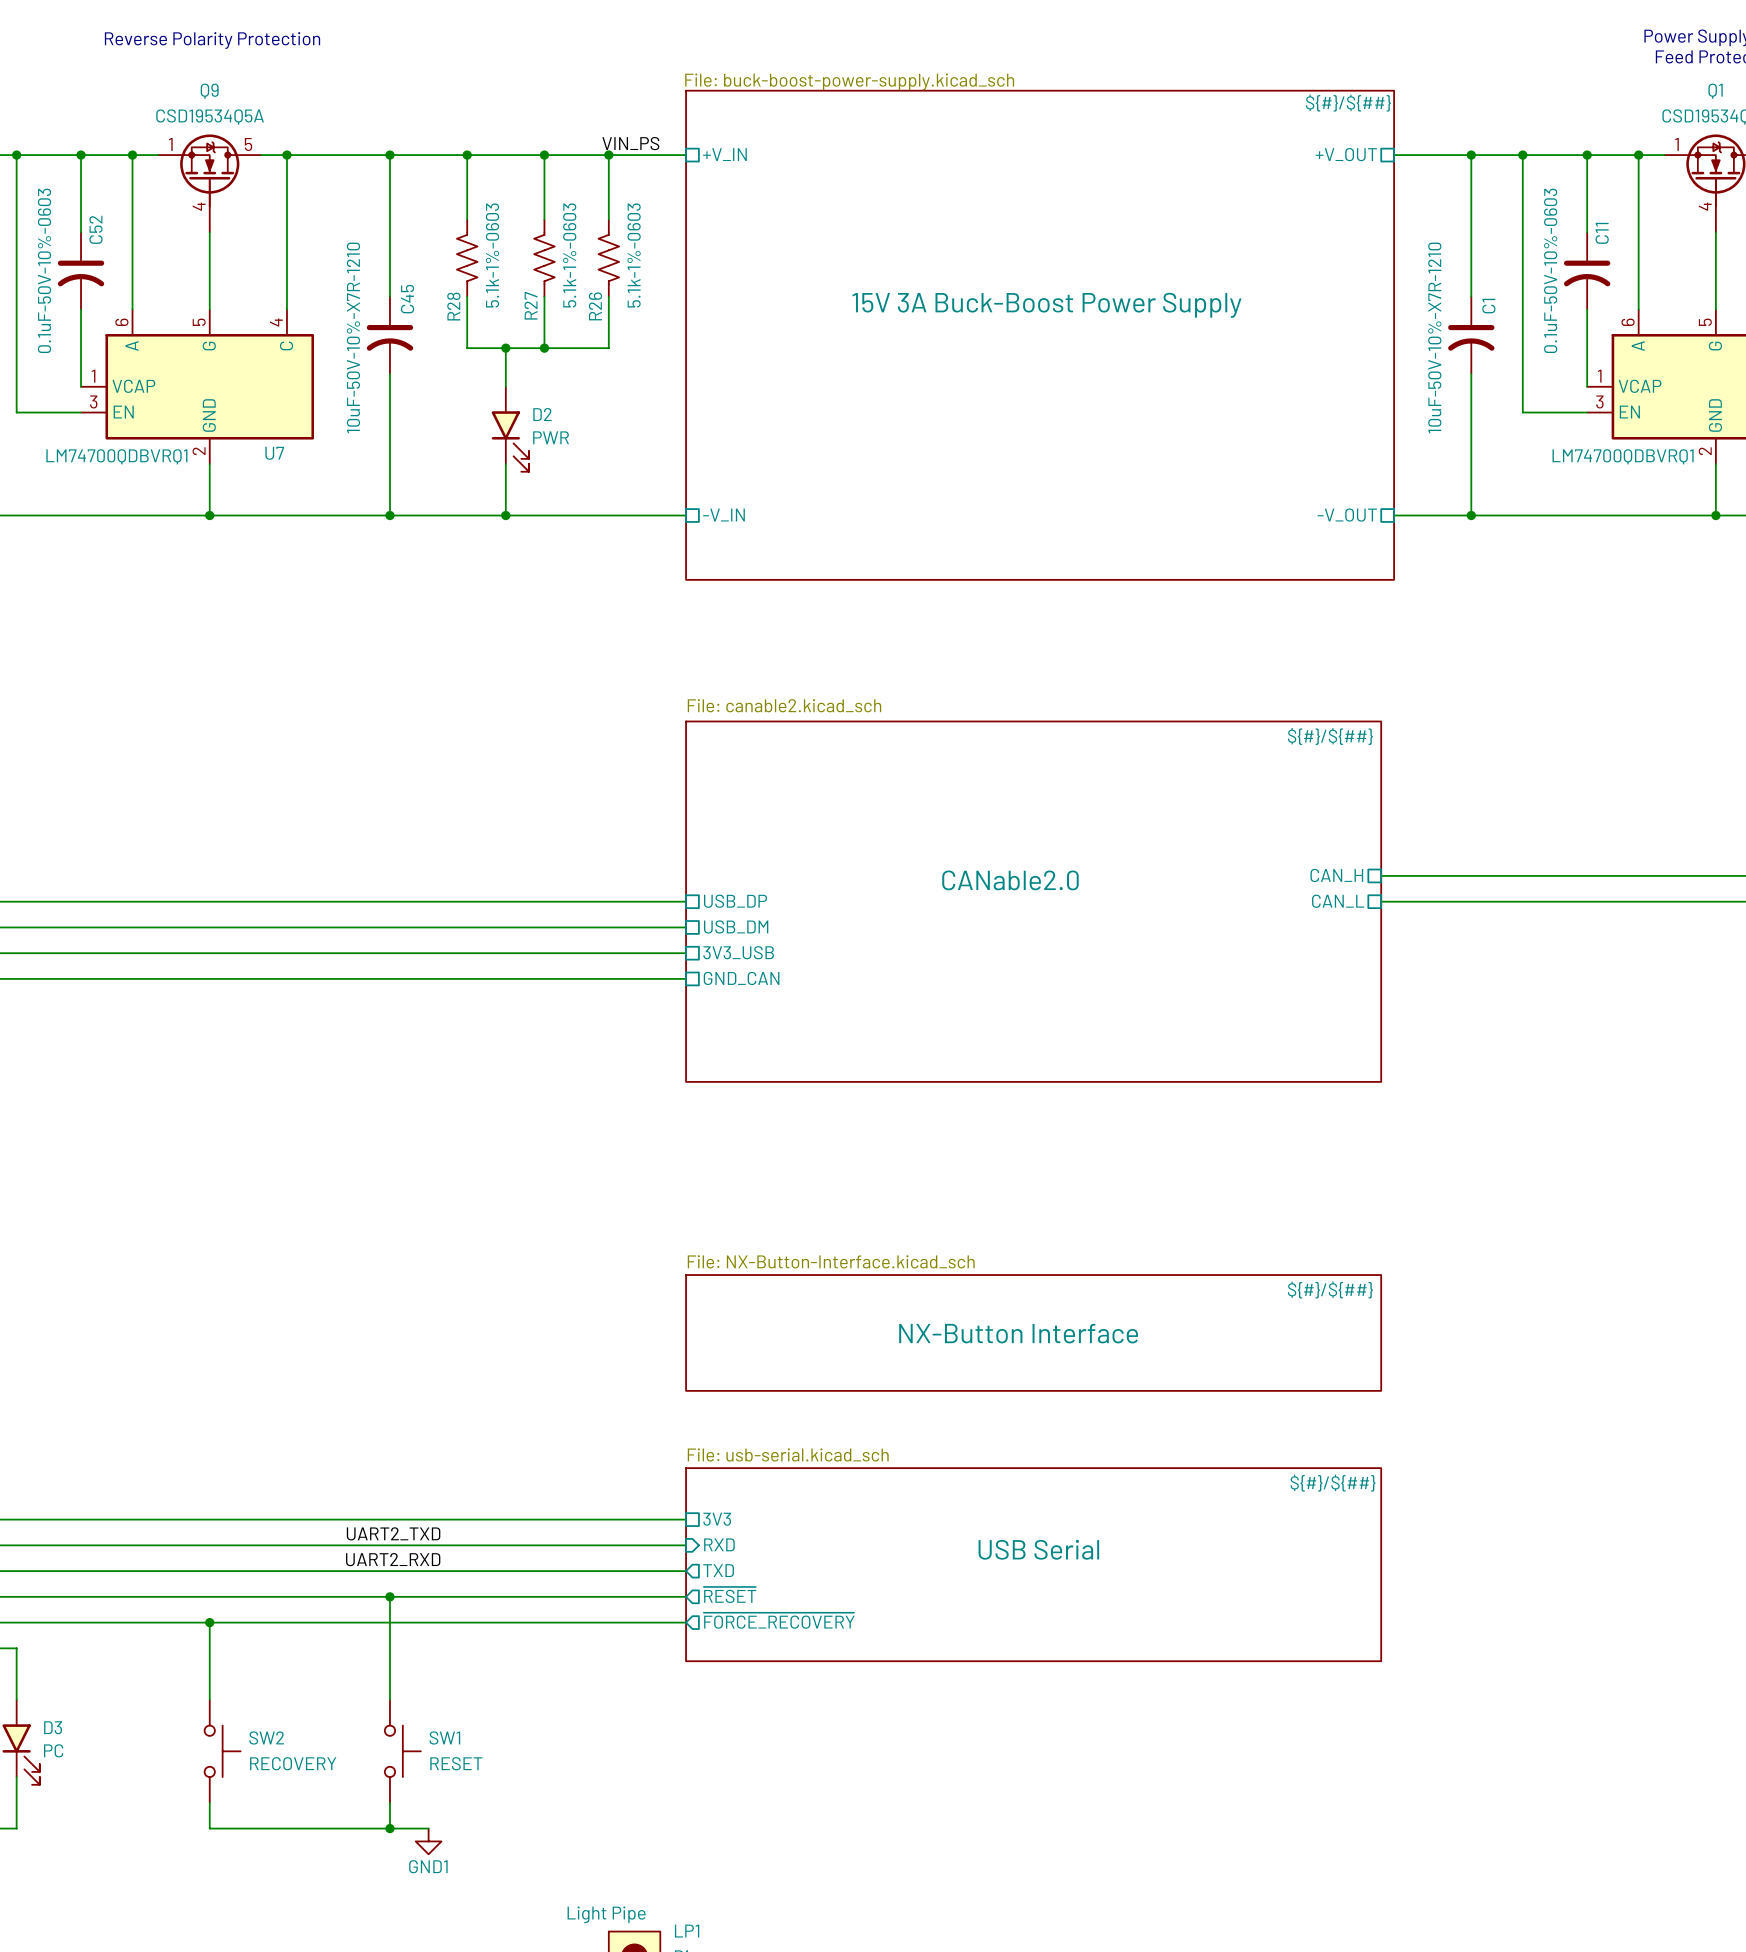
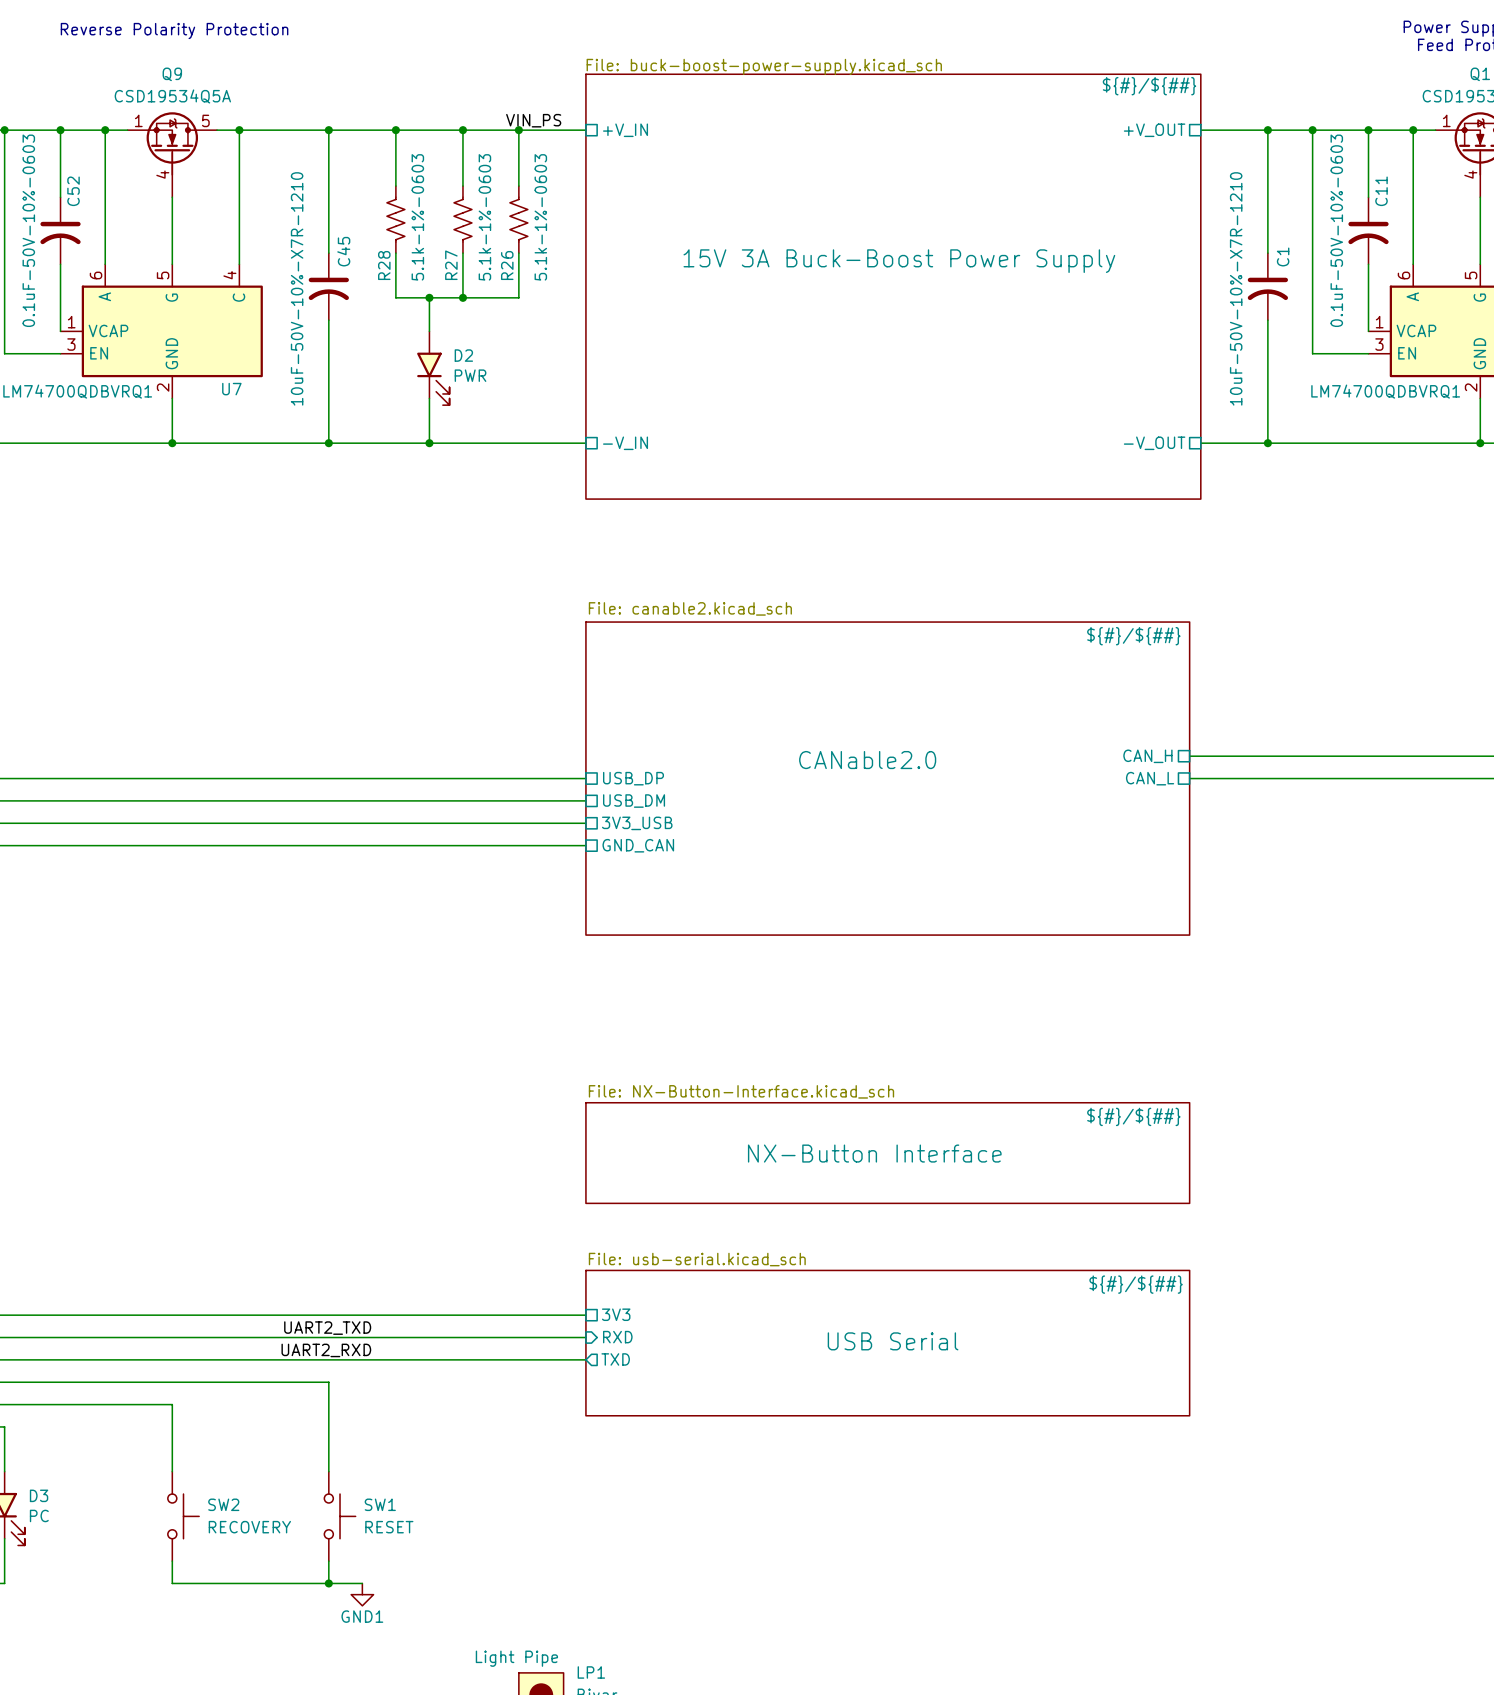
sheet USB Serial: none -> File: usb-serial.kicad_sch (887, 1343)
sheet USB Serial: File: usb-serial.kicad_sch (1033, 1564) -> none
sheet pin: ~{RESET} (730, 1594) -> none
wire: (389, 1596) (686, 1596) -> none
junction: (389, 1596) -> none
sheet pin: ~{FORCE_RECOVERY} (779, 1620) -> none
wire: (209, 1622) (686, 1622) -> none
junction: (209, 1622) -> none

